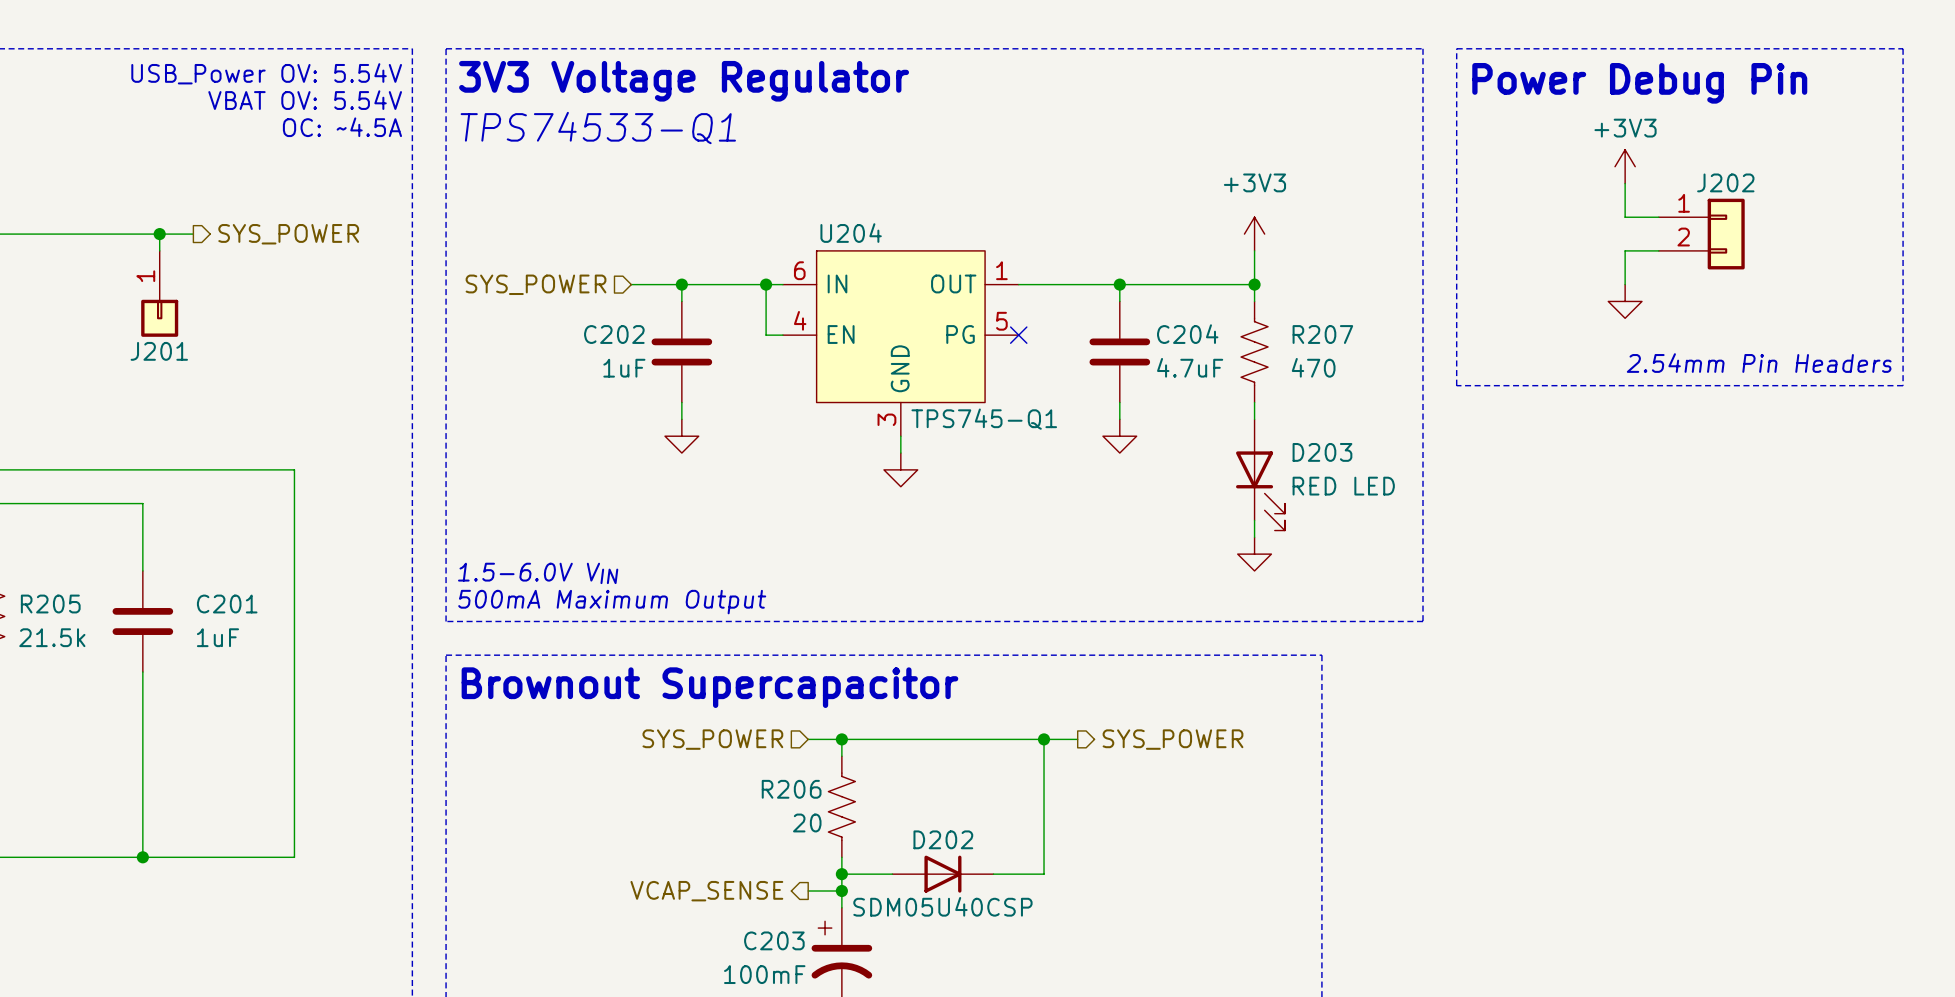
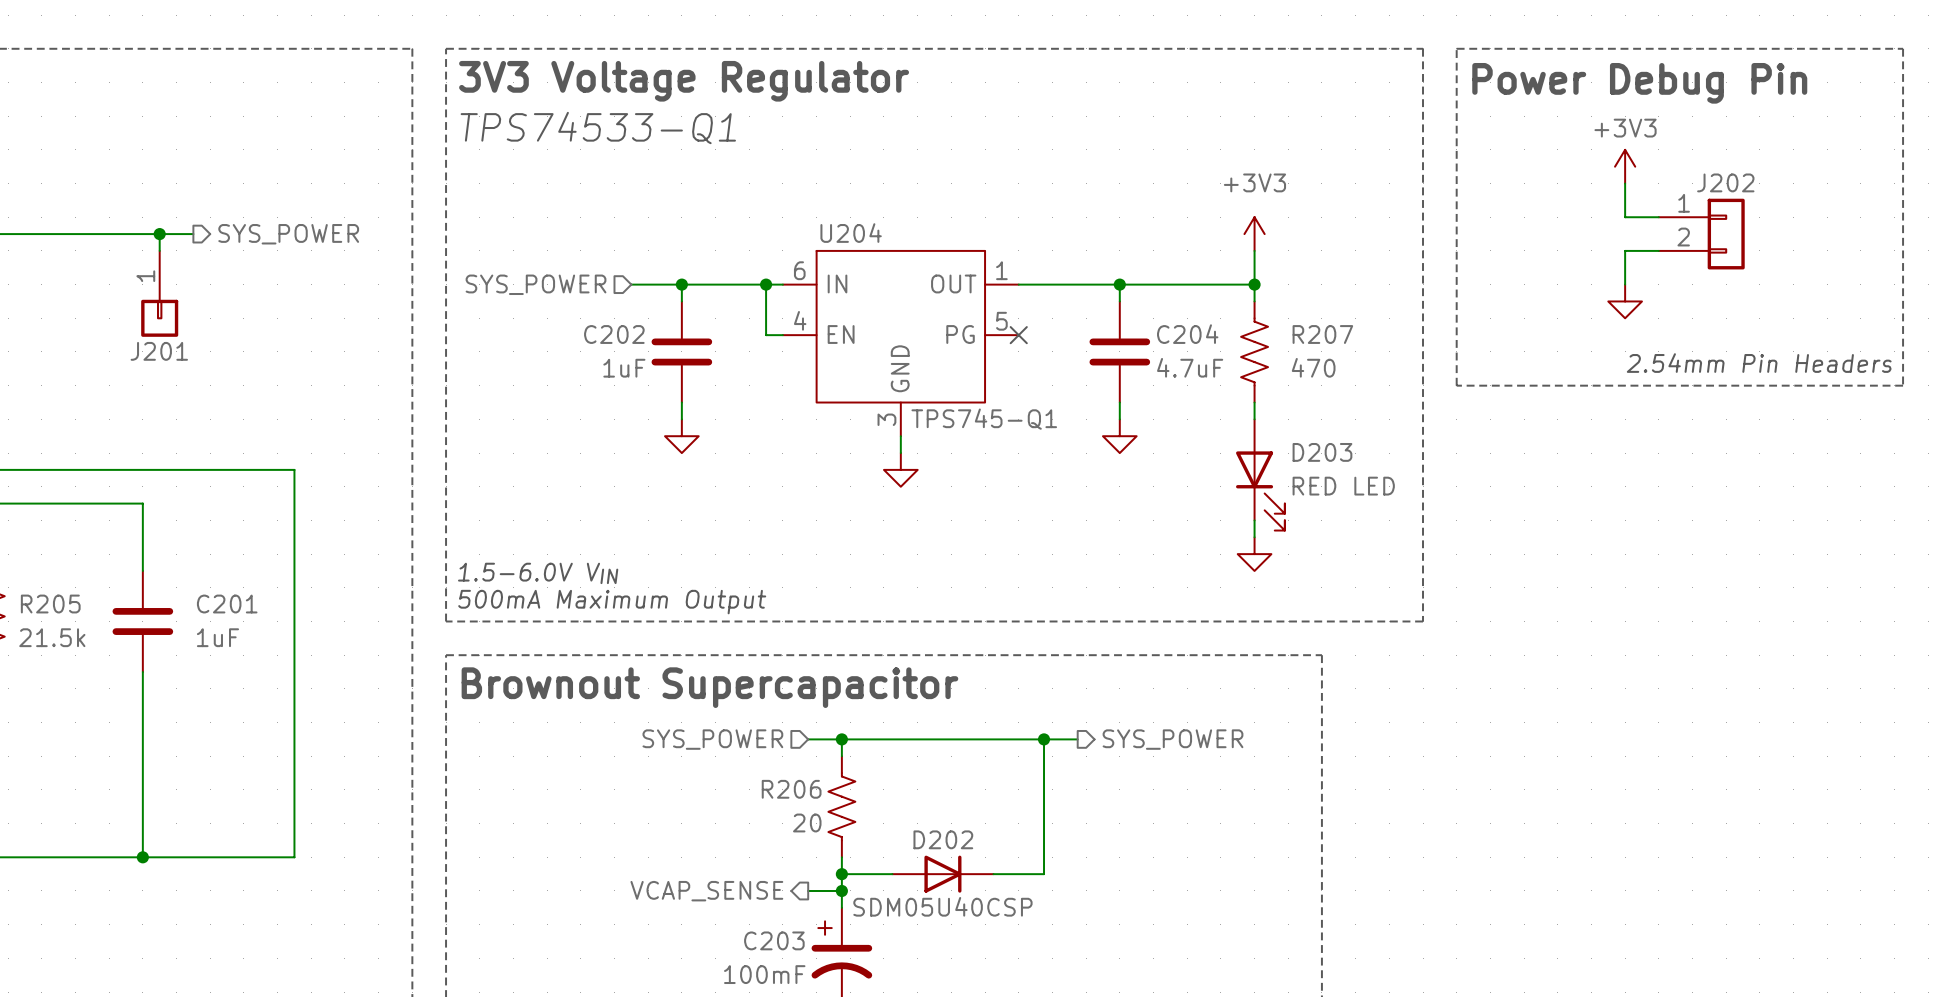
text: USB_Power OV: 5.54V (266, 73) -> none
text: VBAT OV: 5.54V (305, 100) -> none
text: OC: ~4.5A (342, 127) -> none

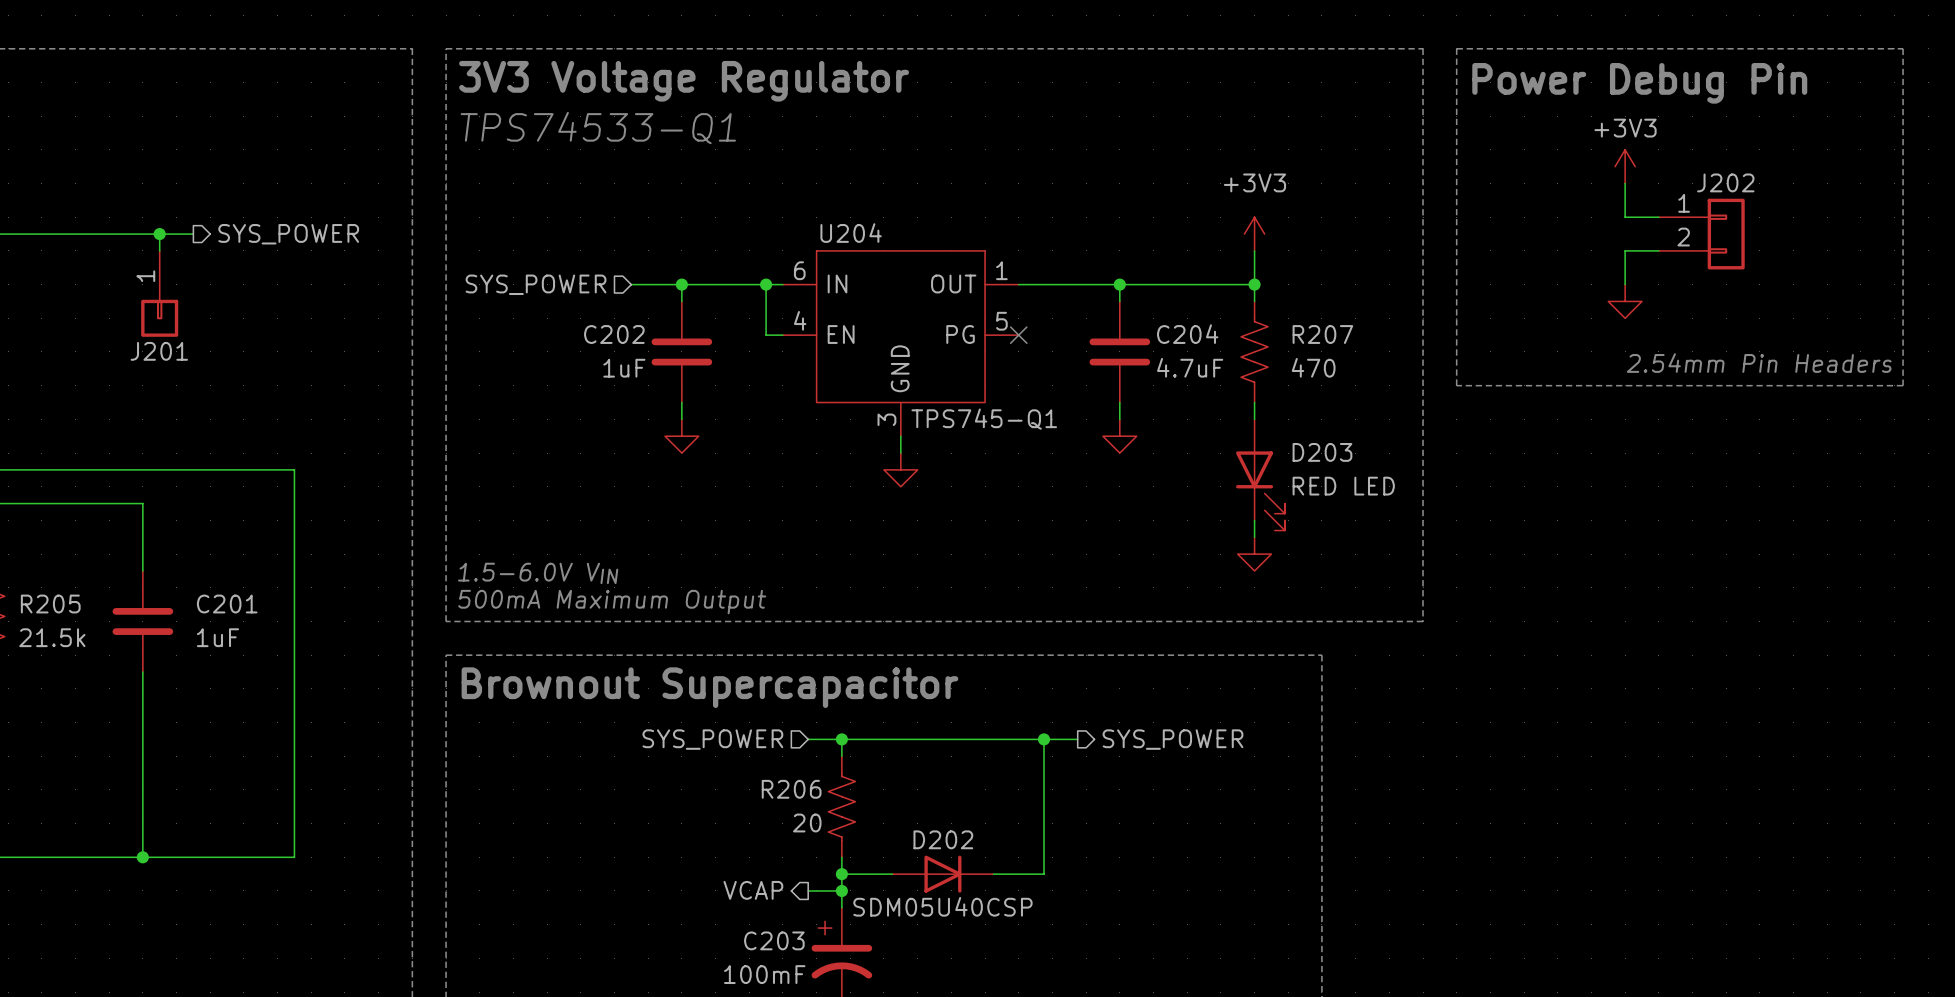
hierarchical label: VCAP_SENSE (706, 891) -> VCAP (753, 890)

